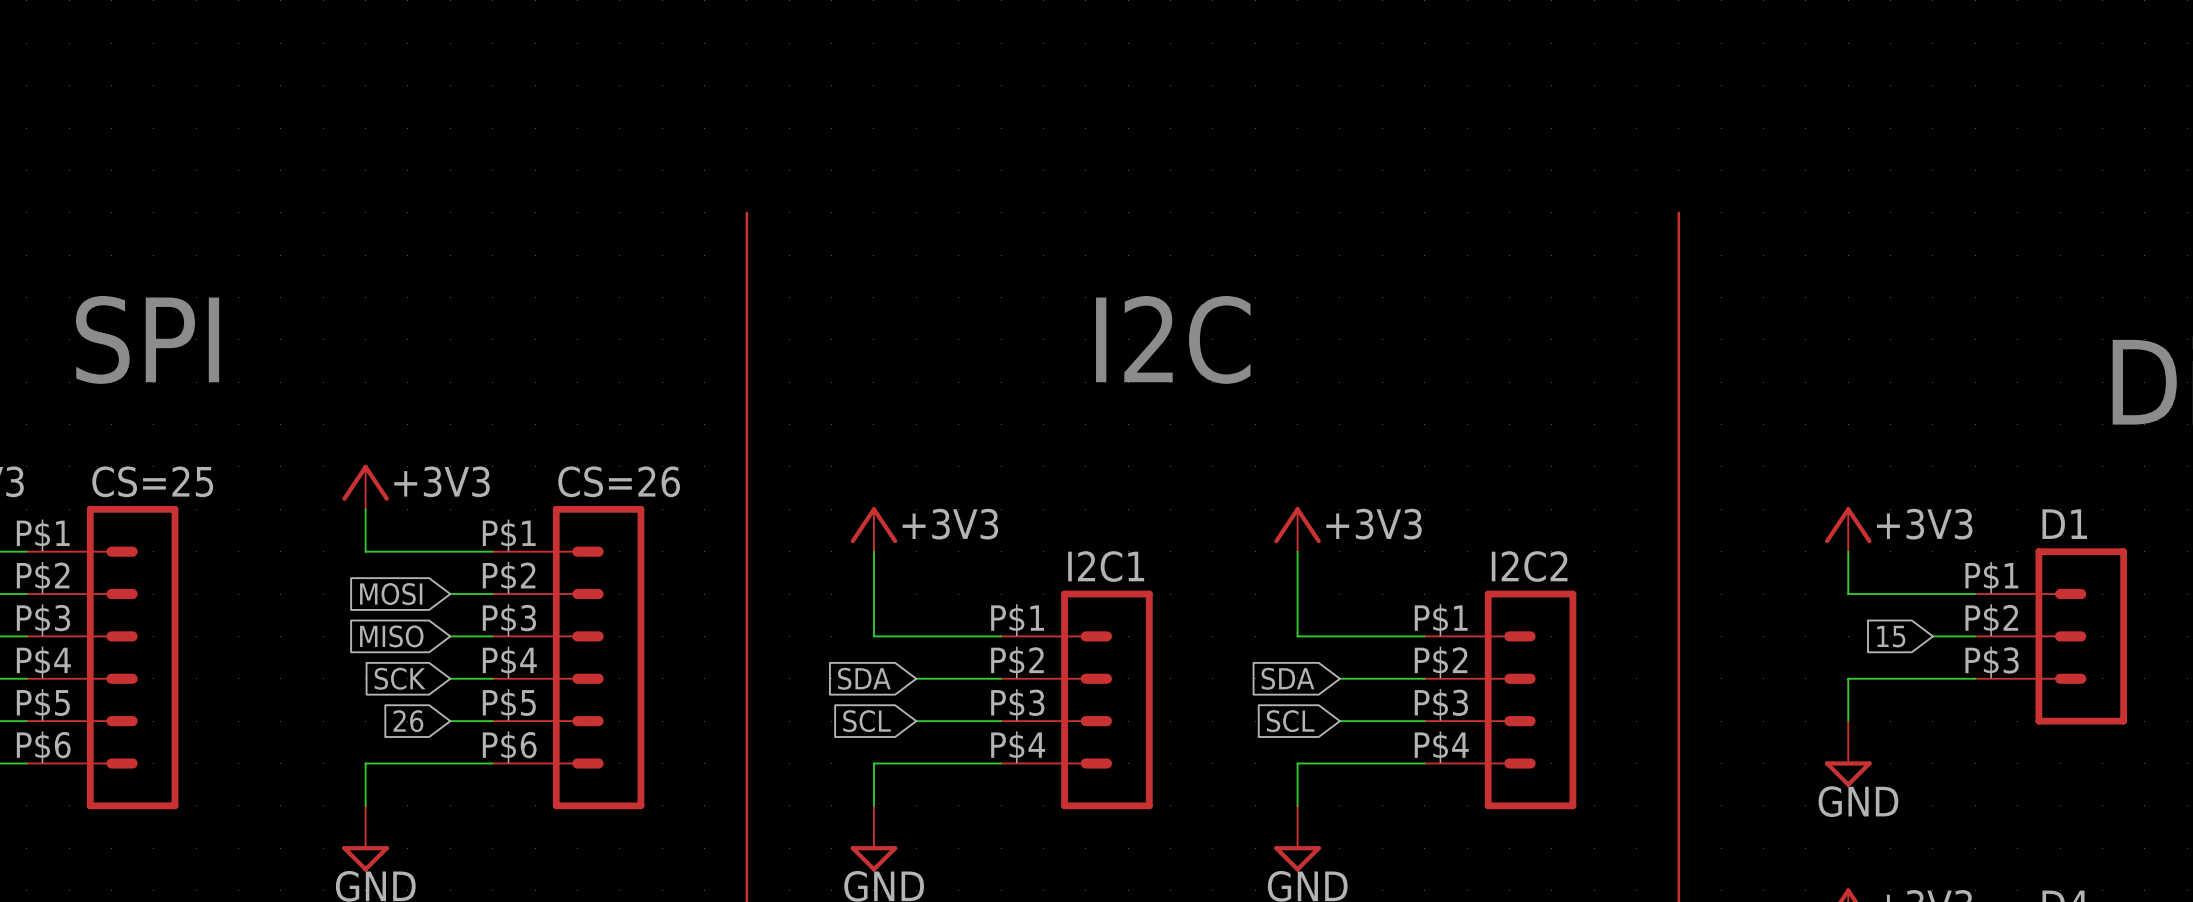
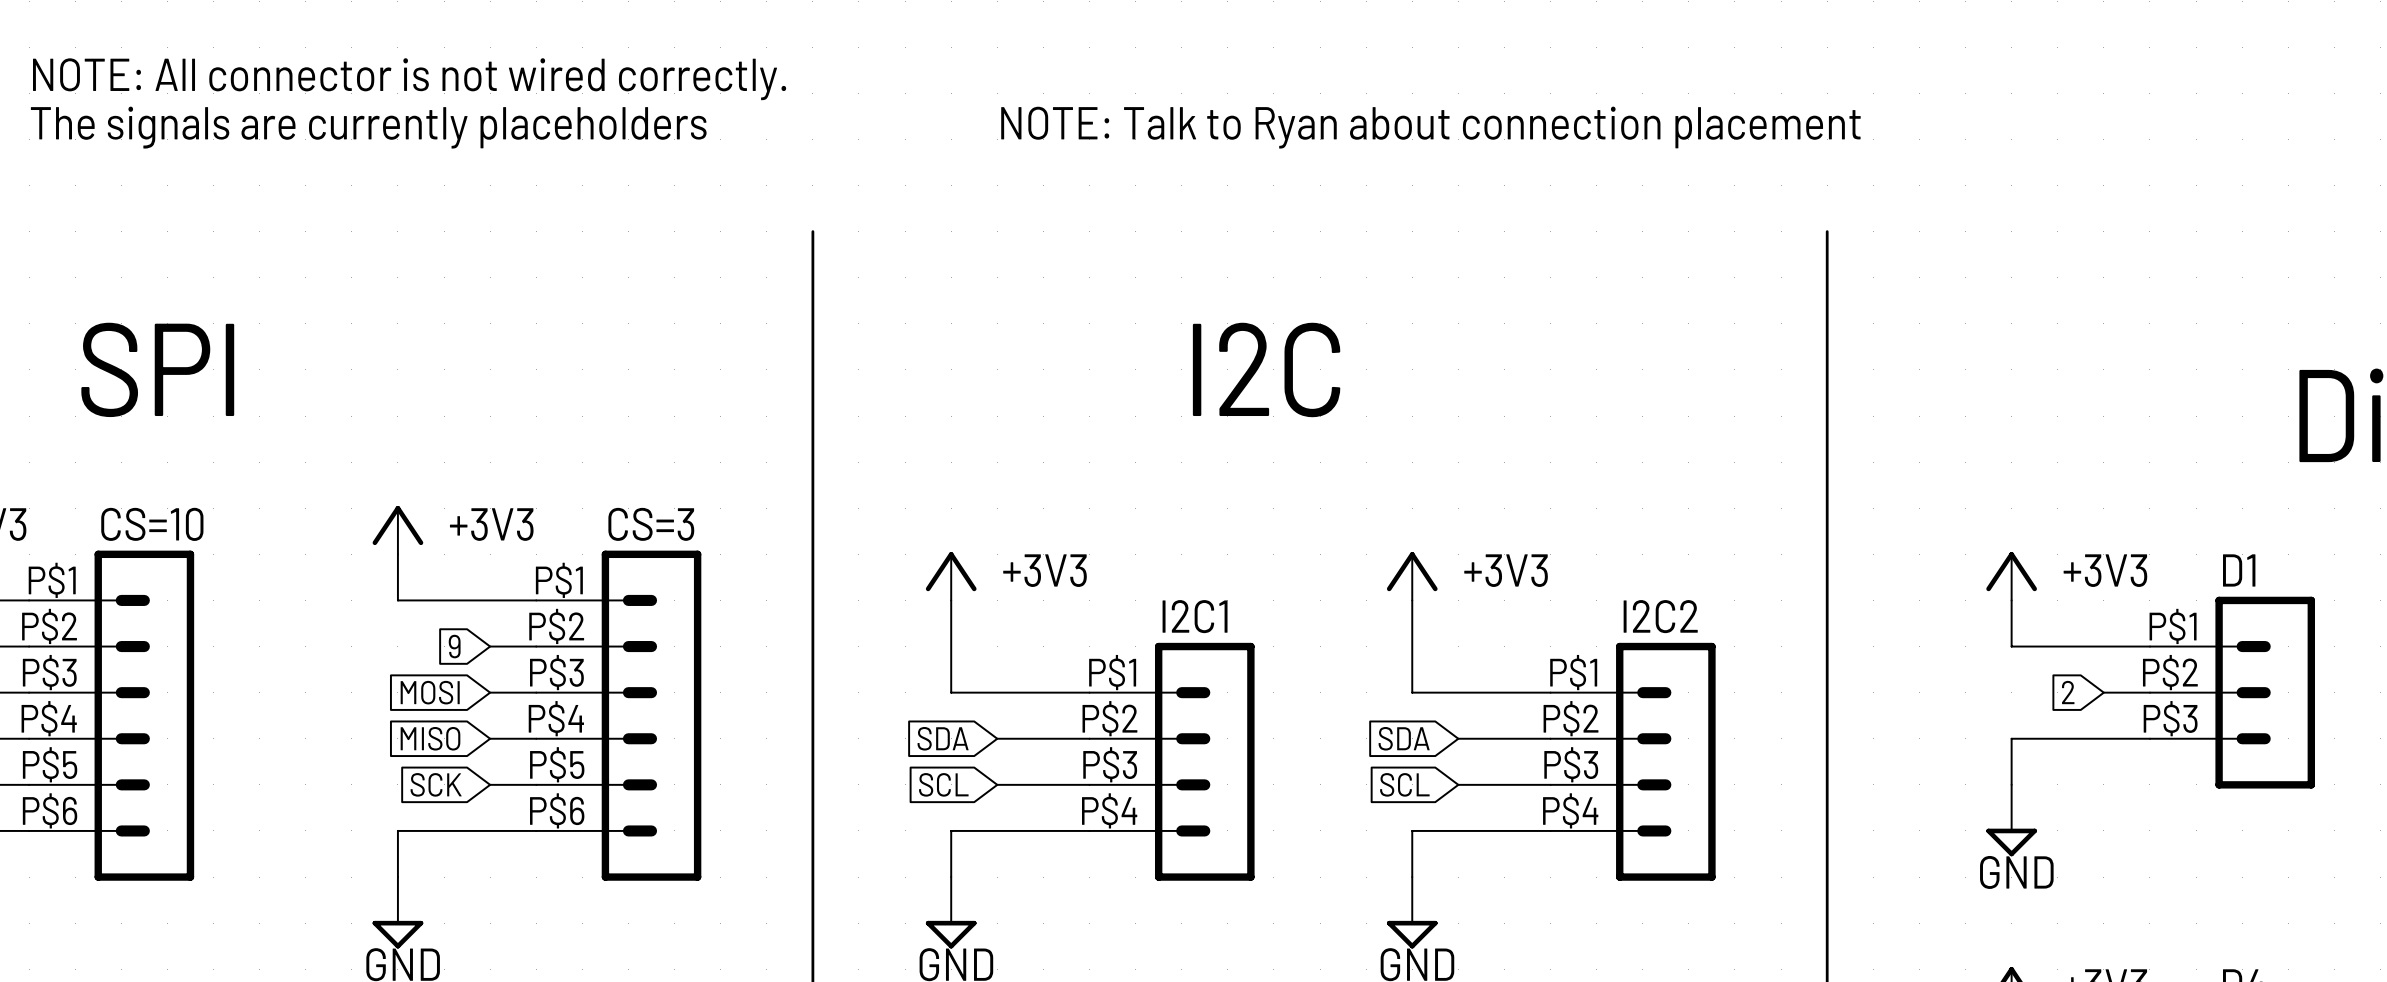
text: none -> NOTE: All connector is not wired correctly. (409, 79)
text: none -> The signals are currently placeholders (368, 127)
text: none -> NOTE: Talk to Ryan about connection placement (1430, 127)
CS=25 name: CS=25 (152, 481) -> CS=10 (152, 524)
CS=26 name: CS=26 (619, 481) -> CS=3 (651, 524)
global label: MOSI (391, 594) -> 9 (454, 646)
global label: MISO (391, 636) -> MOSI (430, 692)
global label: 15 (1891, 636) -> 2 (2068, 692)
global label: SCK (400, 678) -> MISO (430, 738)
global label: 26 (408, 721) -> SCK (436, 784)

